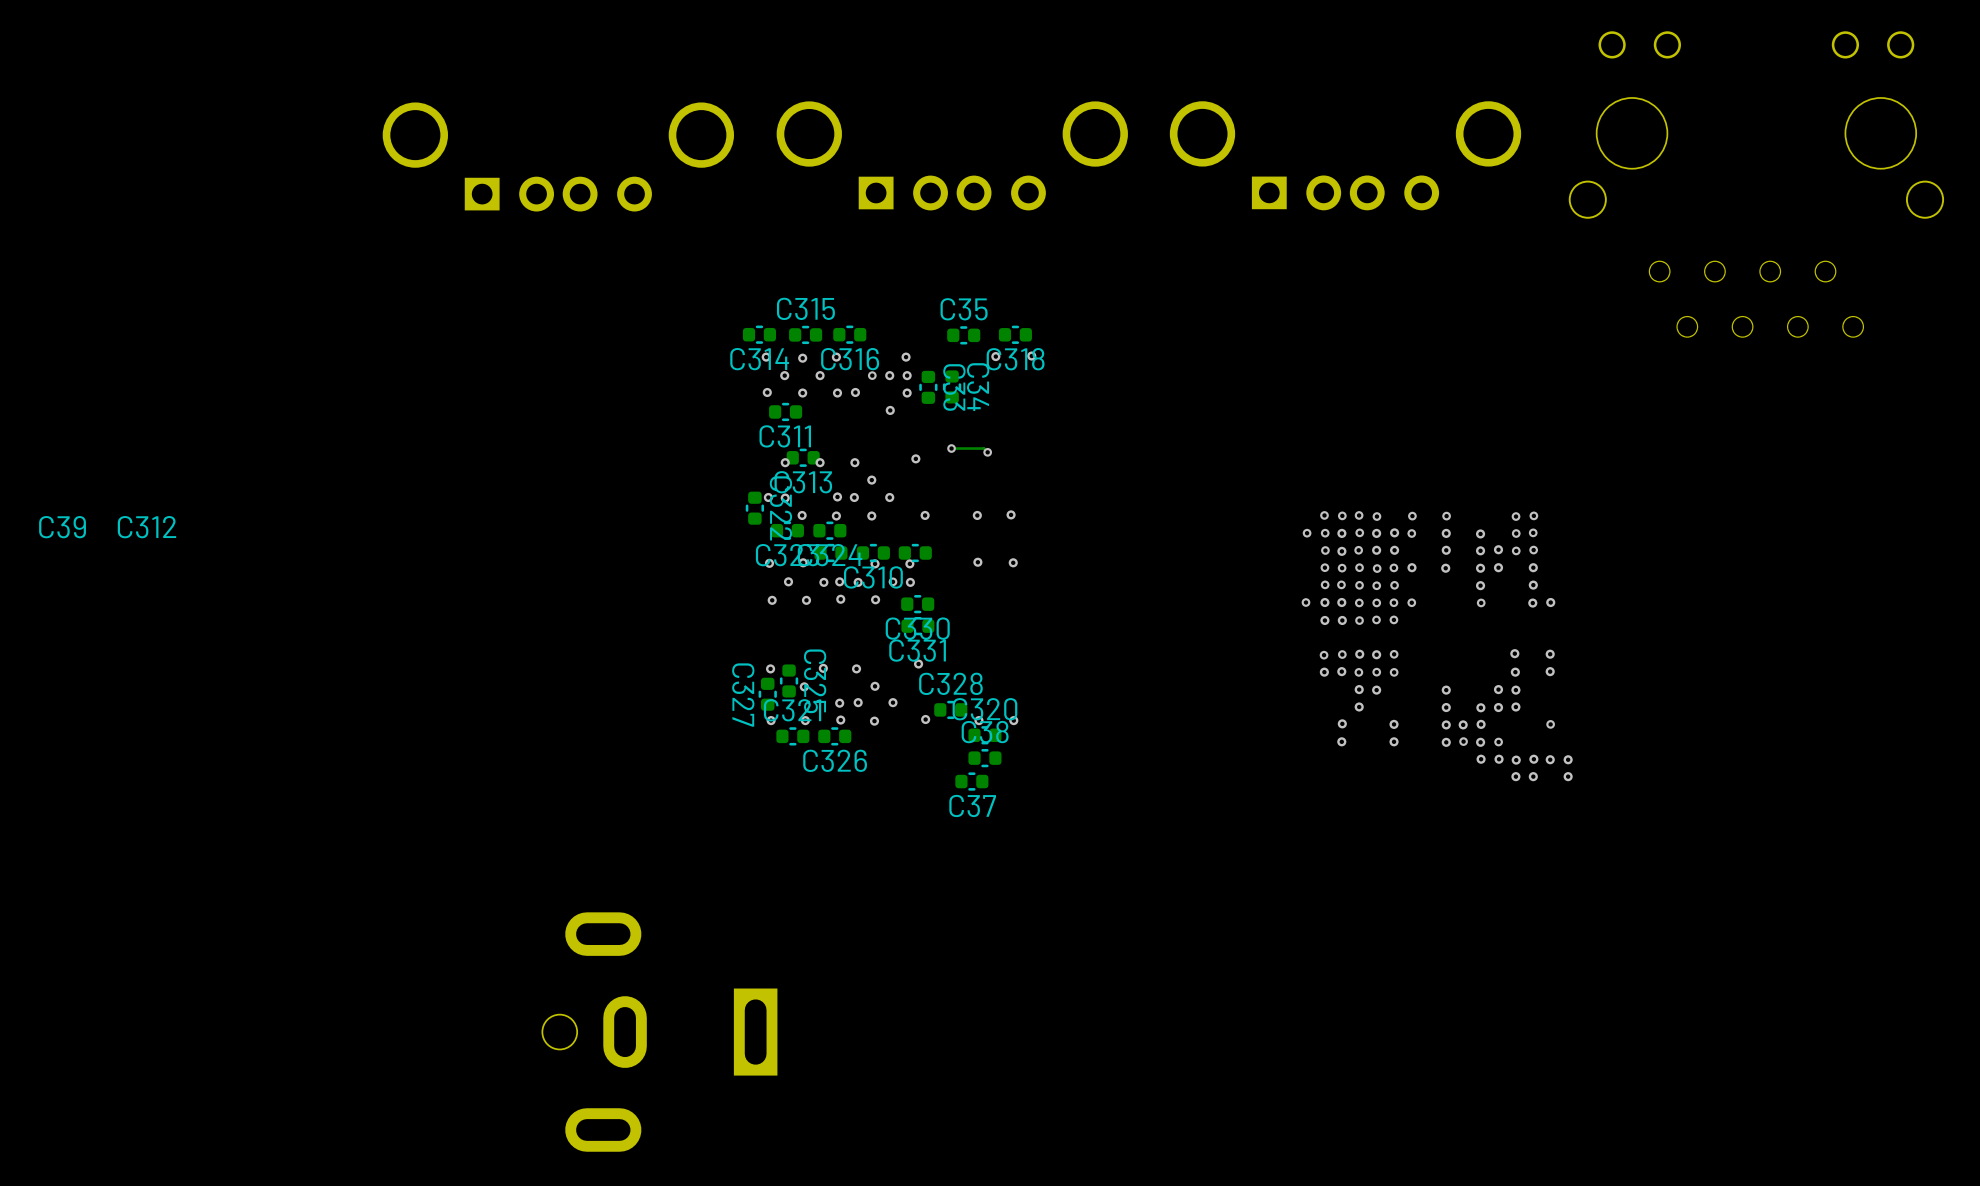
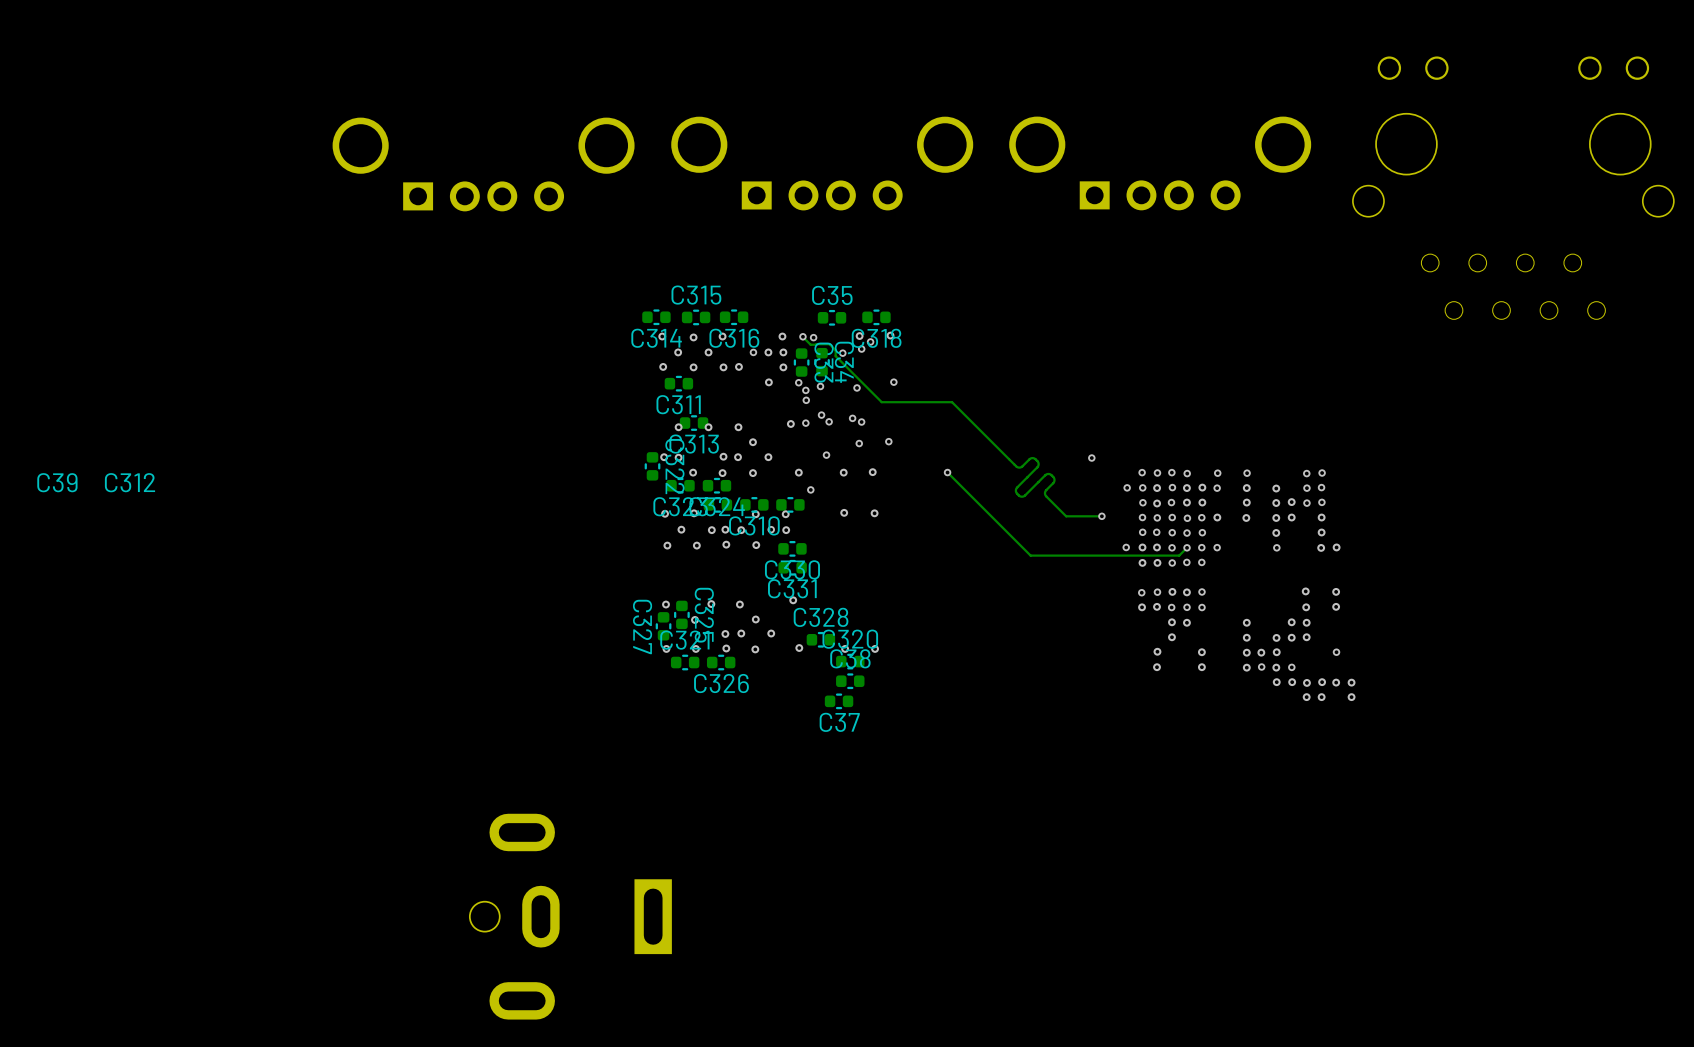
track: none -> (802, 337) (810, 344) (829, 344) (835, 350) (835, 356) (881, 402) (952, 402) (1016, 466) (1021, 466) (1030, 458) (1035, 459) (1038, 462) (1038, 466) (1016, 488) (1016, 492) (1019, 496) (1024, 495) (1045, 474) (1049, 474) (1053, 477) (1054, 481) (1045, 491) (1045, 494) (1066, 516) (1101, 516)
via: none -> (802, 336)
via: none -> (813, 337)
via: none -> (870, 341)
via: none -> (861, 349)
via: none -> (842, 353)
via: none -> (798, 382)
via: none -> (893, 382)
via: none -> (820, 386)
via: none -> (857, 387)
via: none -> (805, 390)
via: none -> (806, 400)
track: (951, 448) (983, 448) (987, 452) -> none
via: none -> (829, 421)
via: none -> (861, 422)
via: none -> (805, 423)
via: none -> (888, 441)
via: none -> (859, 443)
via: none -> (826, 455)
via: none -> (1091, 458)
track: none -> (947, 472) (1030, 555) (1179, 555) (1187, 547)
via: none -> (947, 472)
via: none -> (810, 489)
via: none -> (1101, 516)

